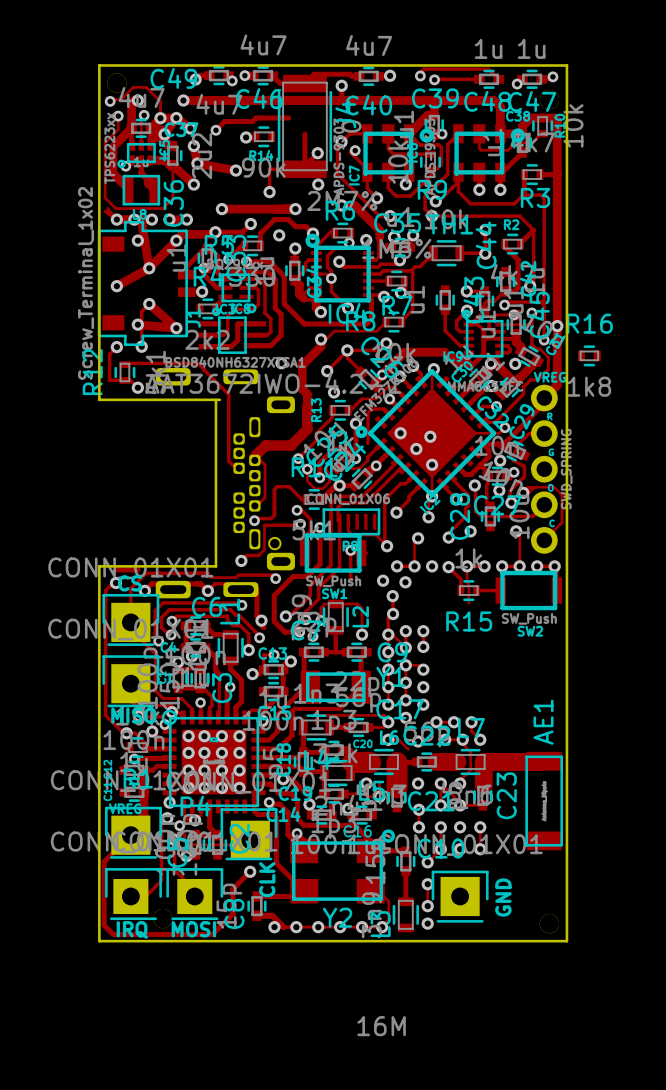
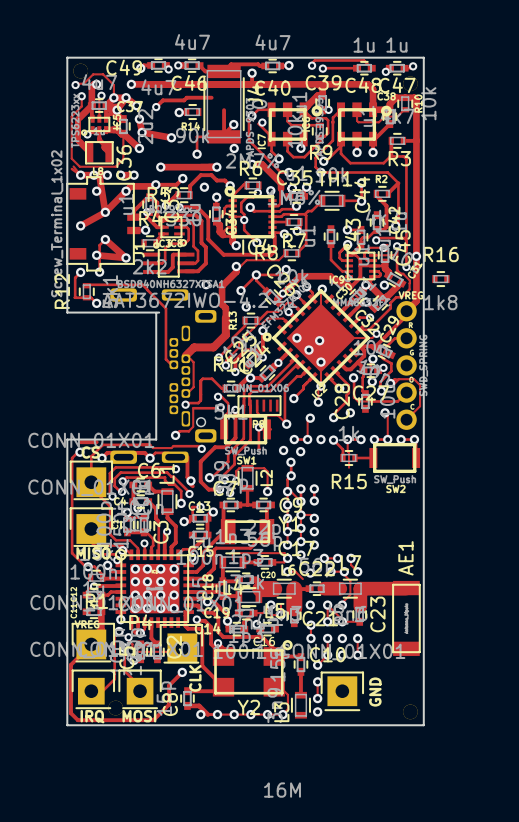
track: (389, 414) (384, 409) (371, 409) (368, 412) (368, 443) -> none
track: (380, 444) (359, 468) (351, 468) (339, 456) (336, 456) (326, 466) (326, 470) (329, 473) (329, 481) (322, 488) (314, 488) (307, 481) (307, 469) -> (288, 323) (283, 318) (267, 318) (261, 323) (257, 323) (239, 342) (239, 347) (225, 360) (225, 365)

